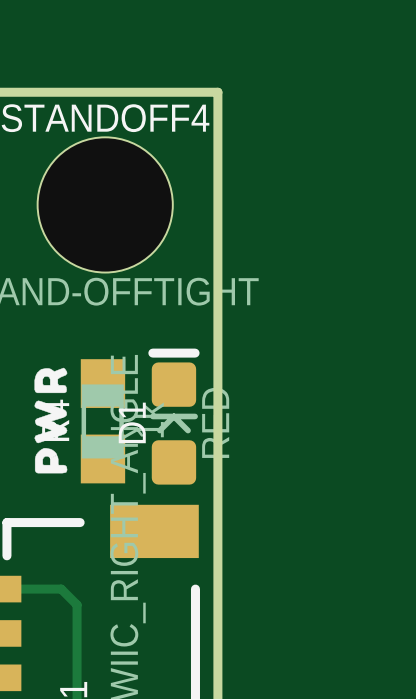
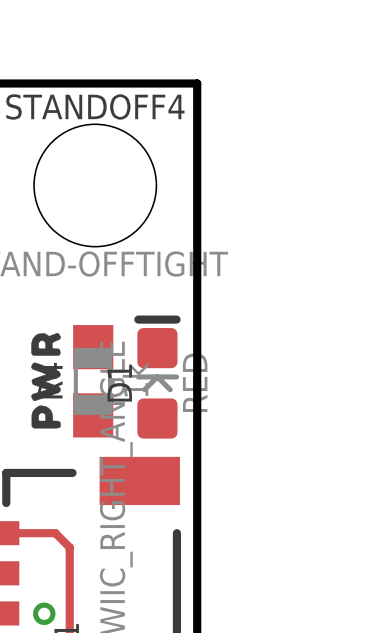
via: none -> (44, 613)

